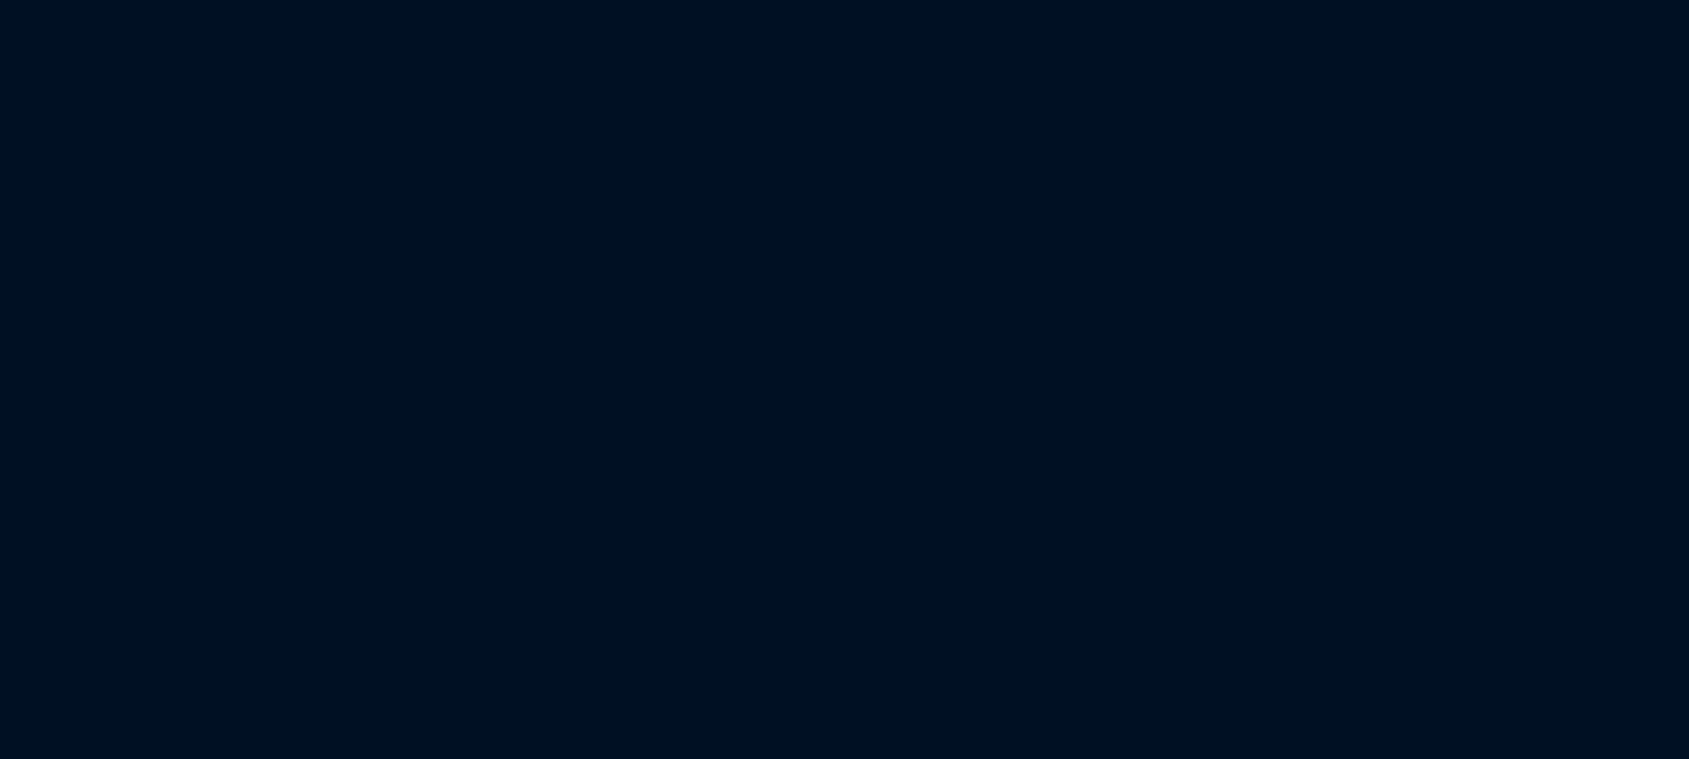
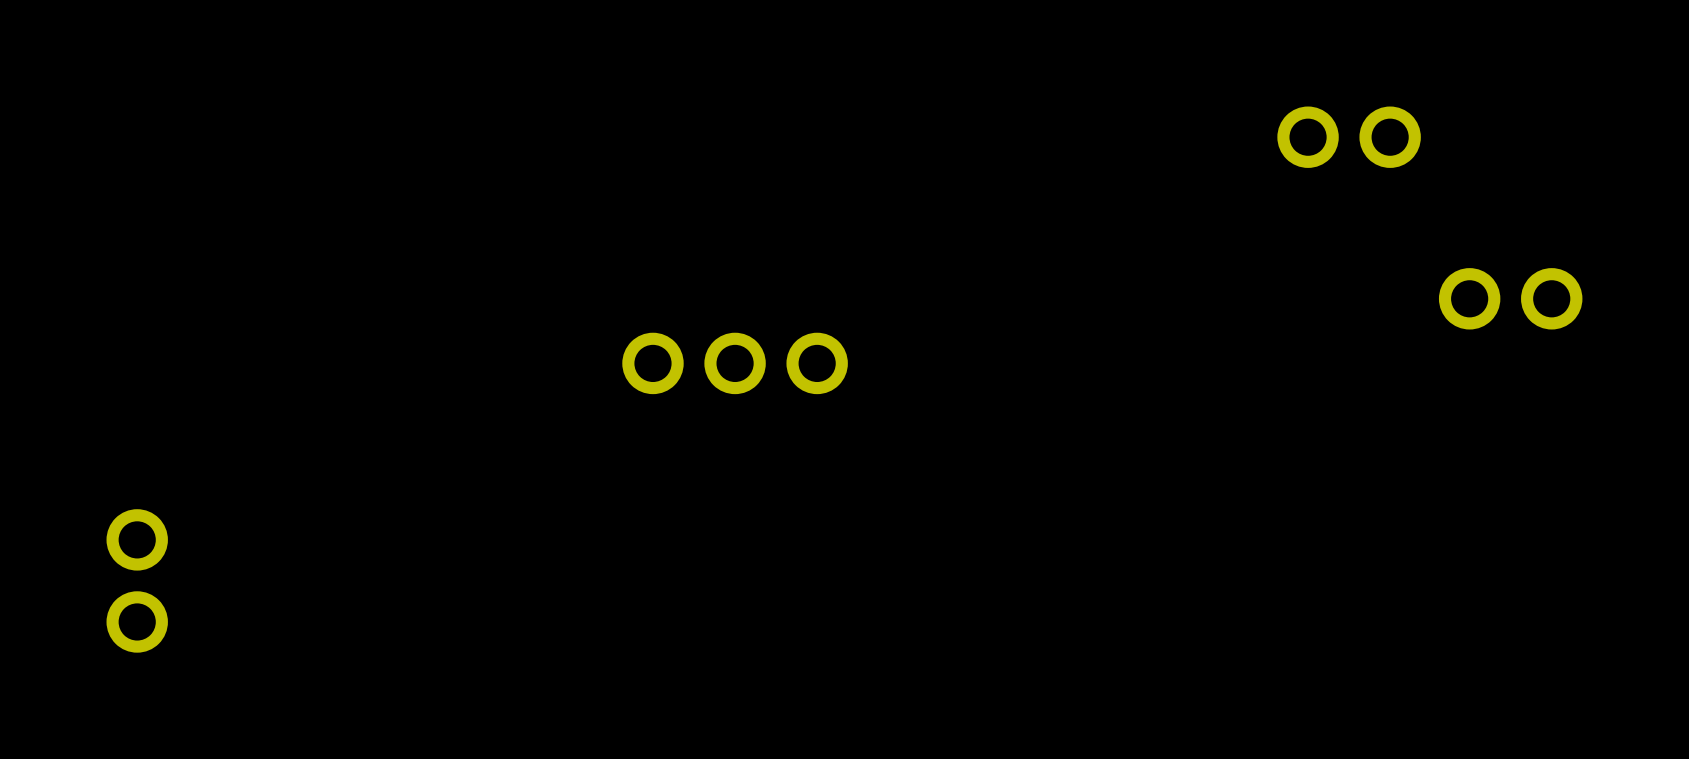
part: none -> (1349, 137)
part: none -> (1510, 298)
part: none -> (735, 363)
part: none -> (137, 580)

